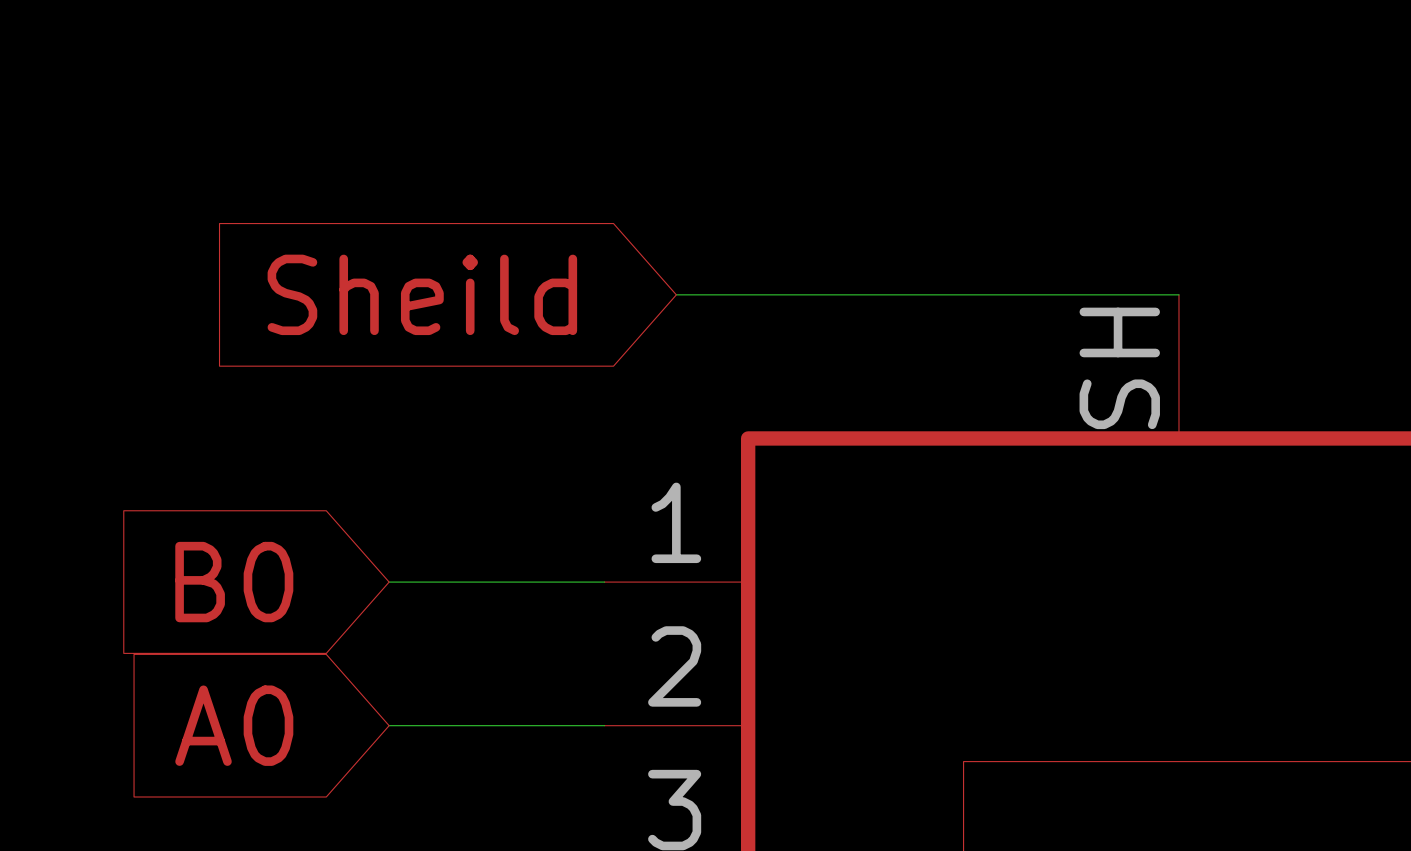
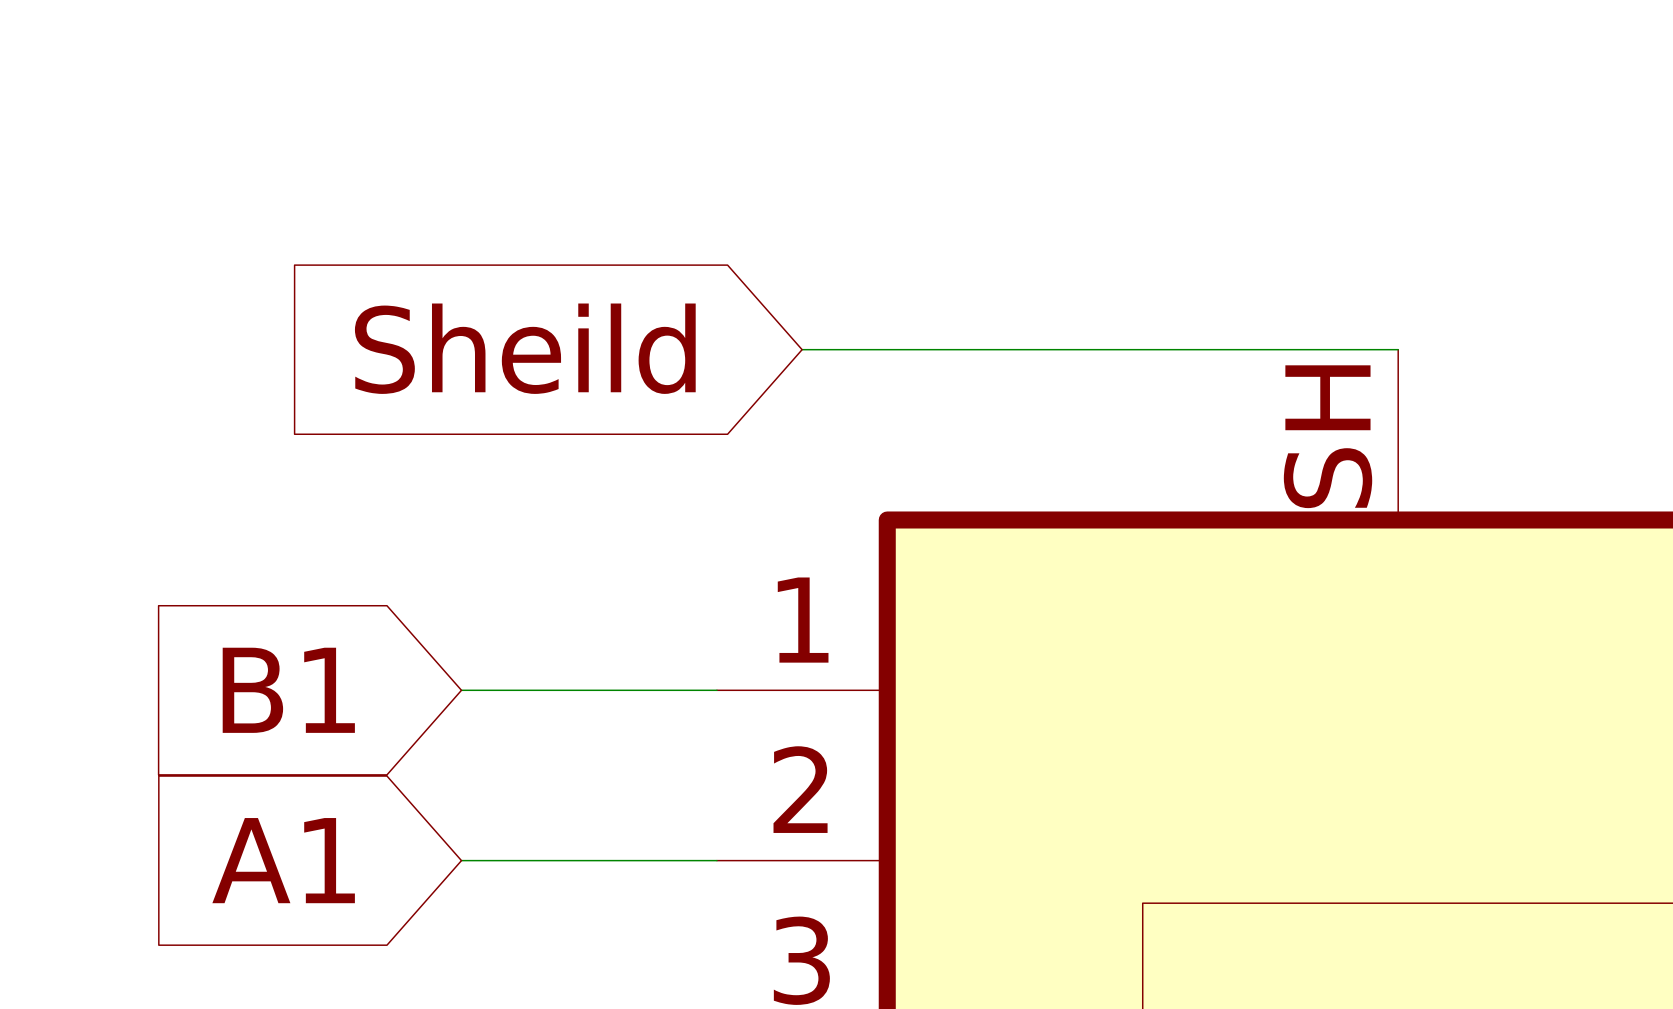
global label: B0 (234, 582) -> B1 (288, 690)
global label: A0 (234, 725) -> A1 (283, 860)

